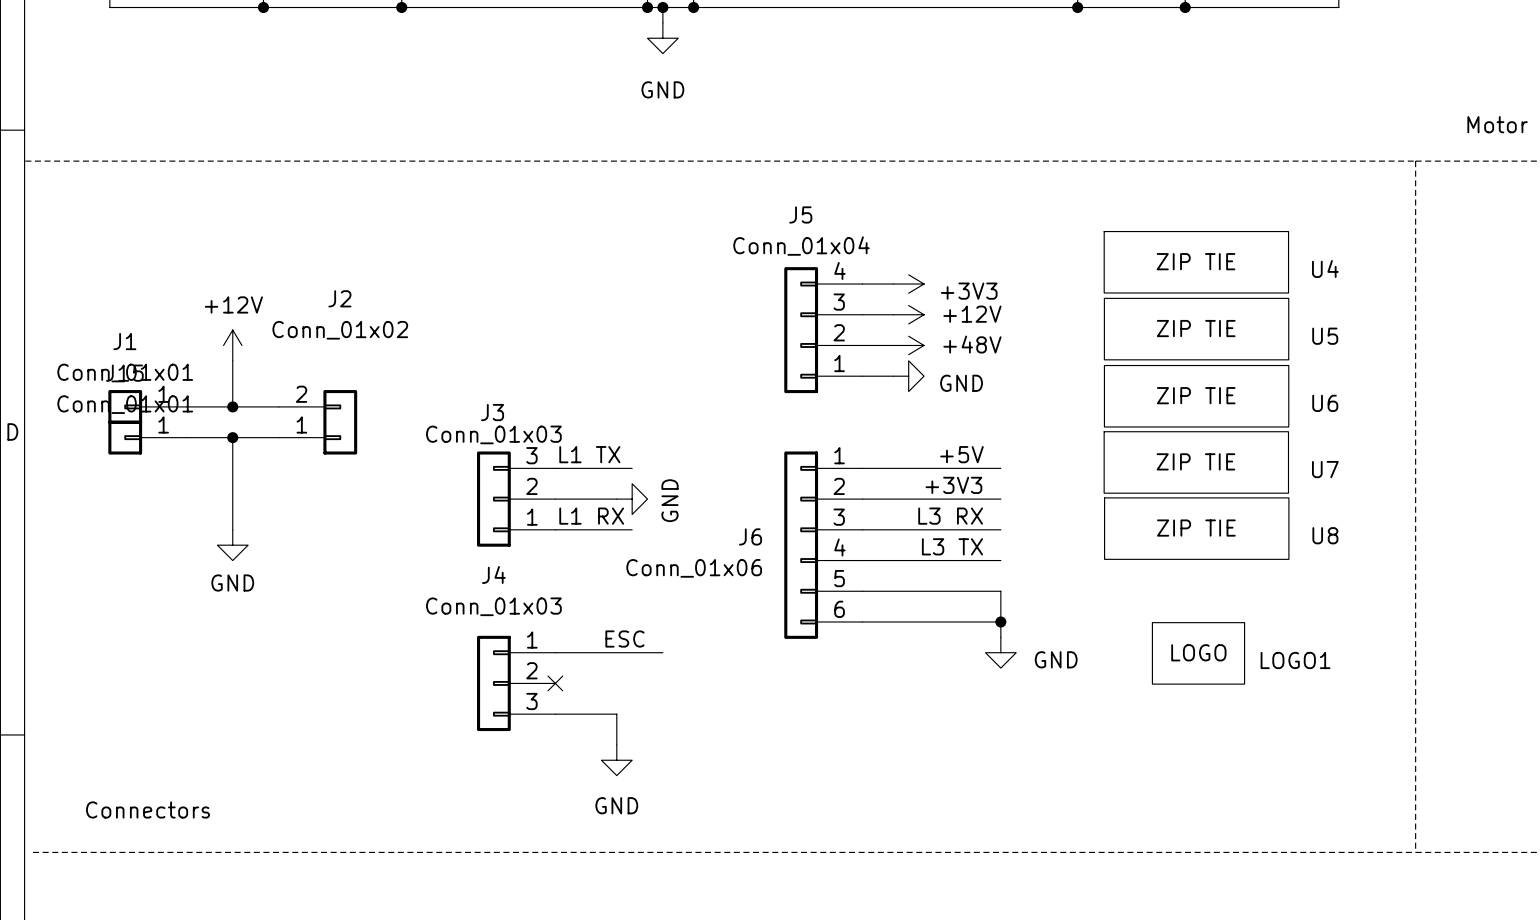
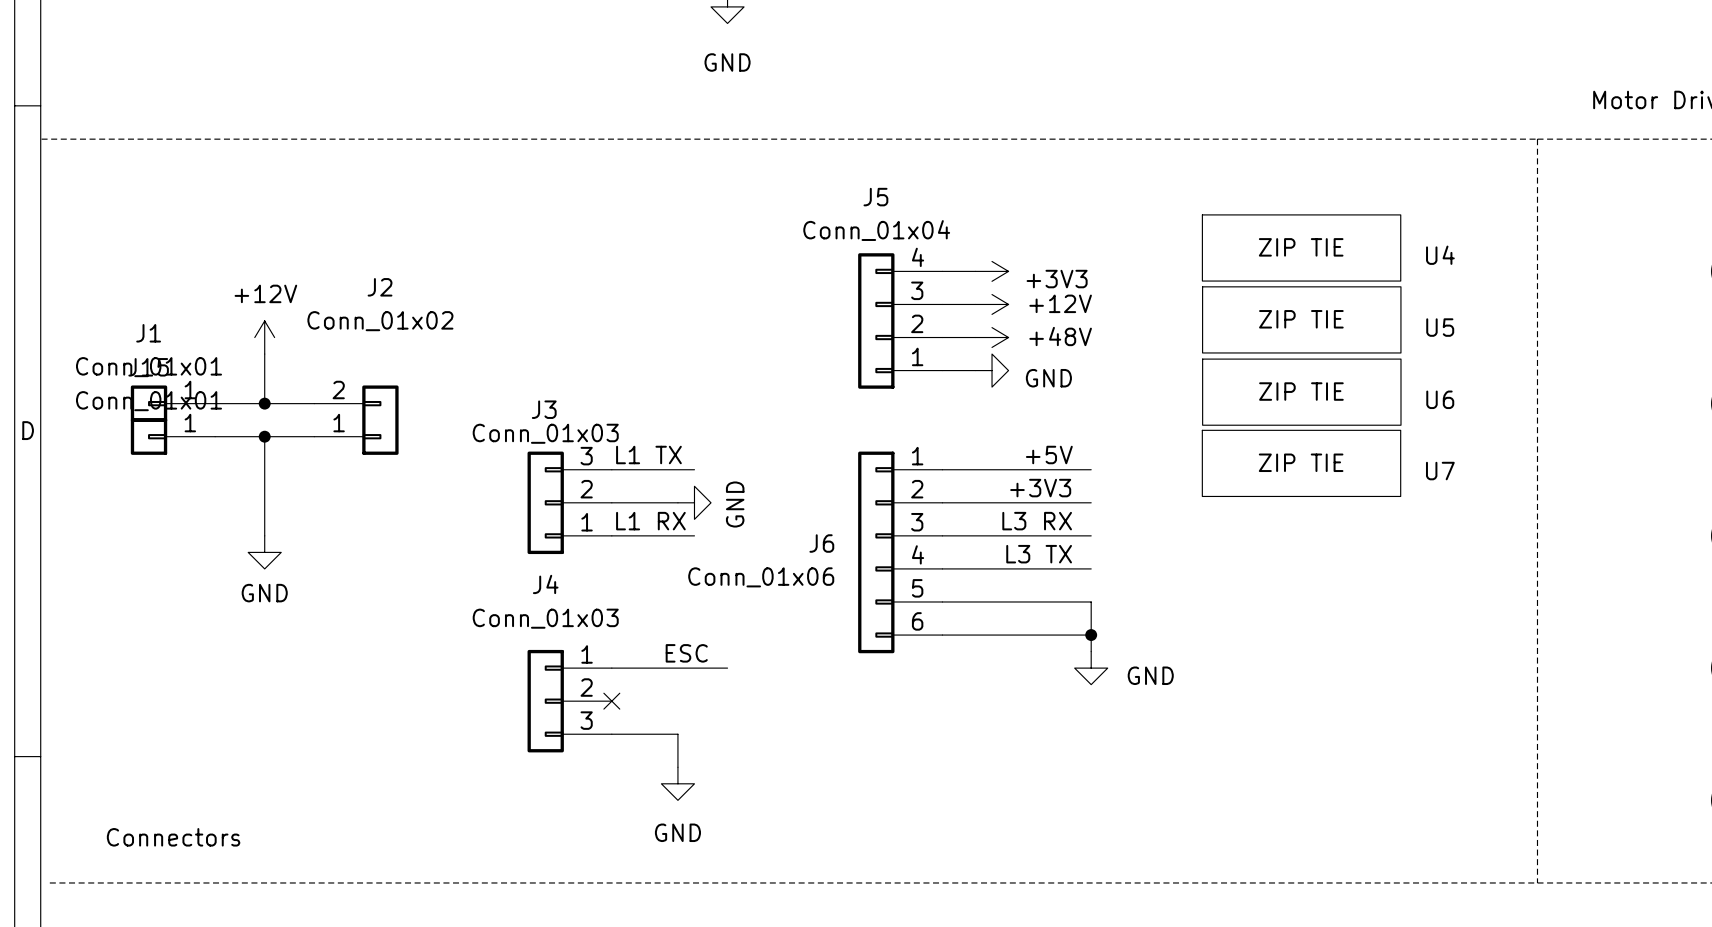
U8: (1196, 528) -> none
LOGO1: (1198, 653) -> none

